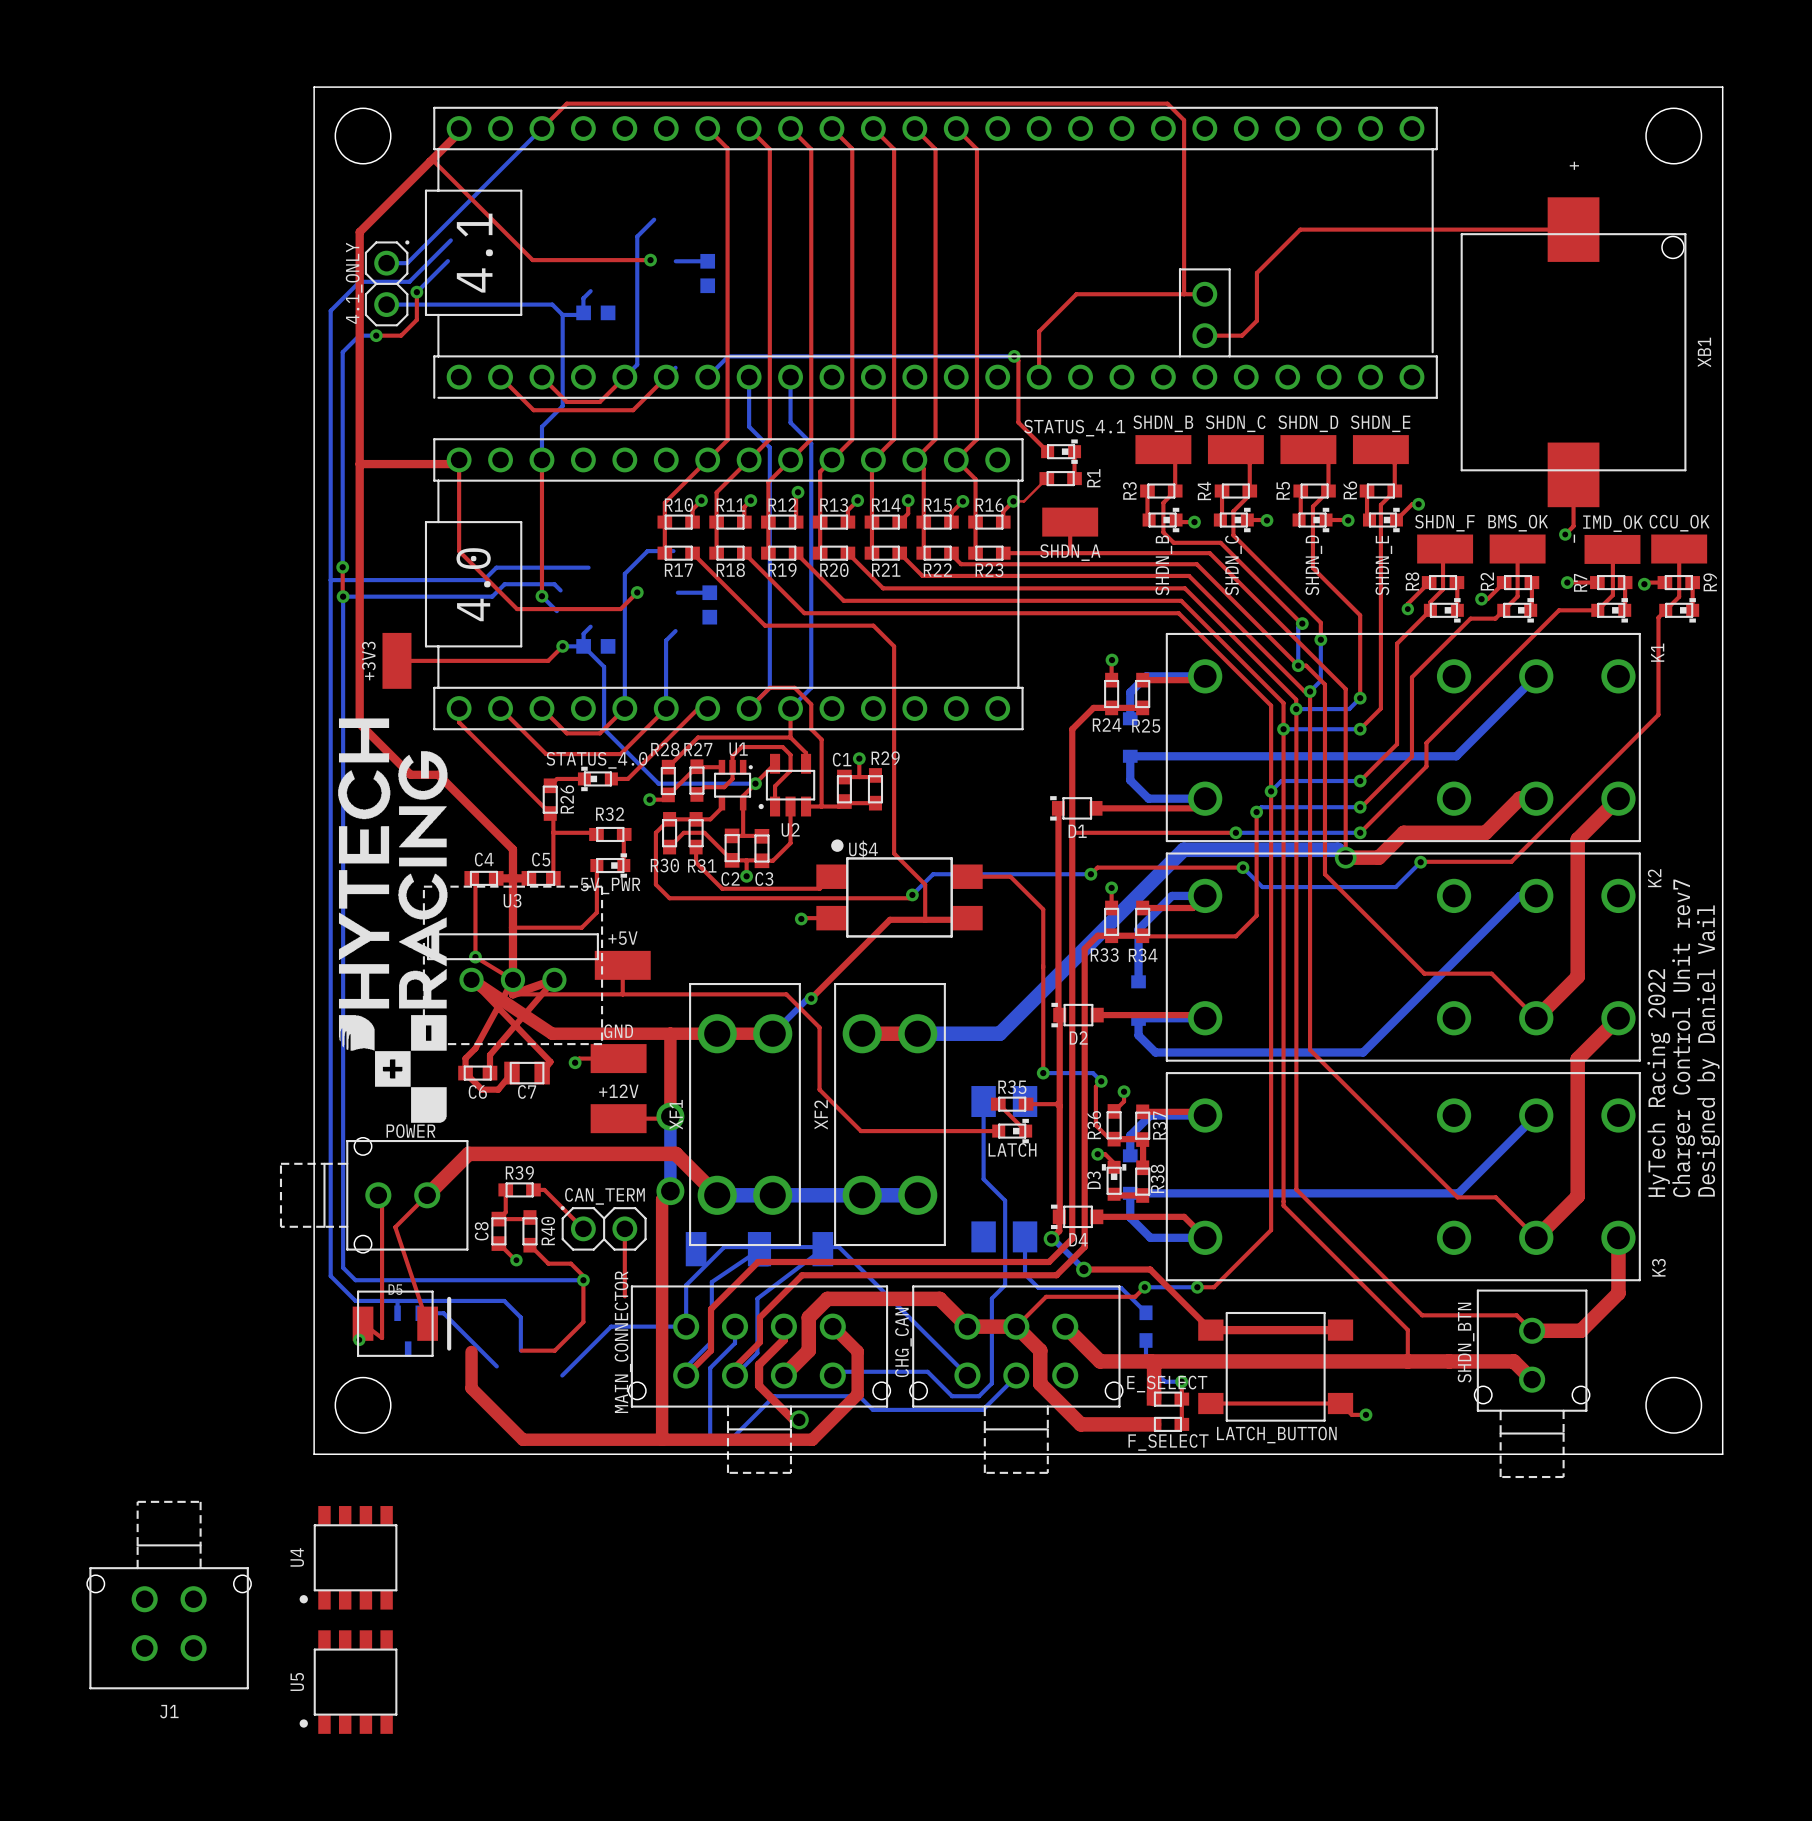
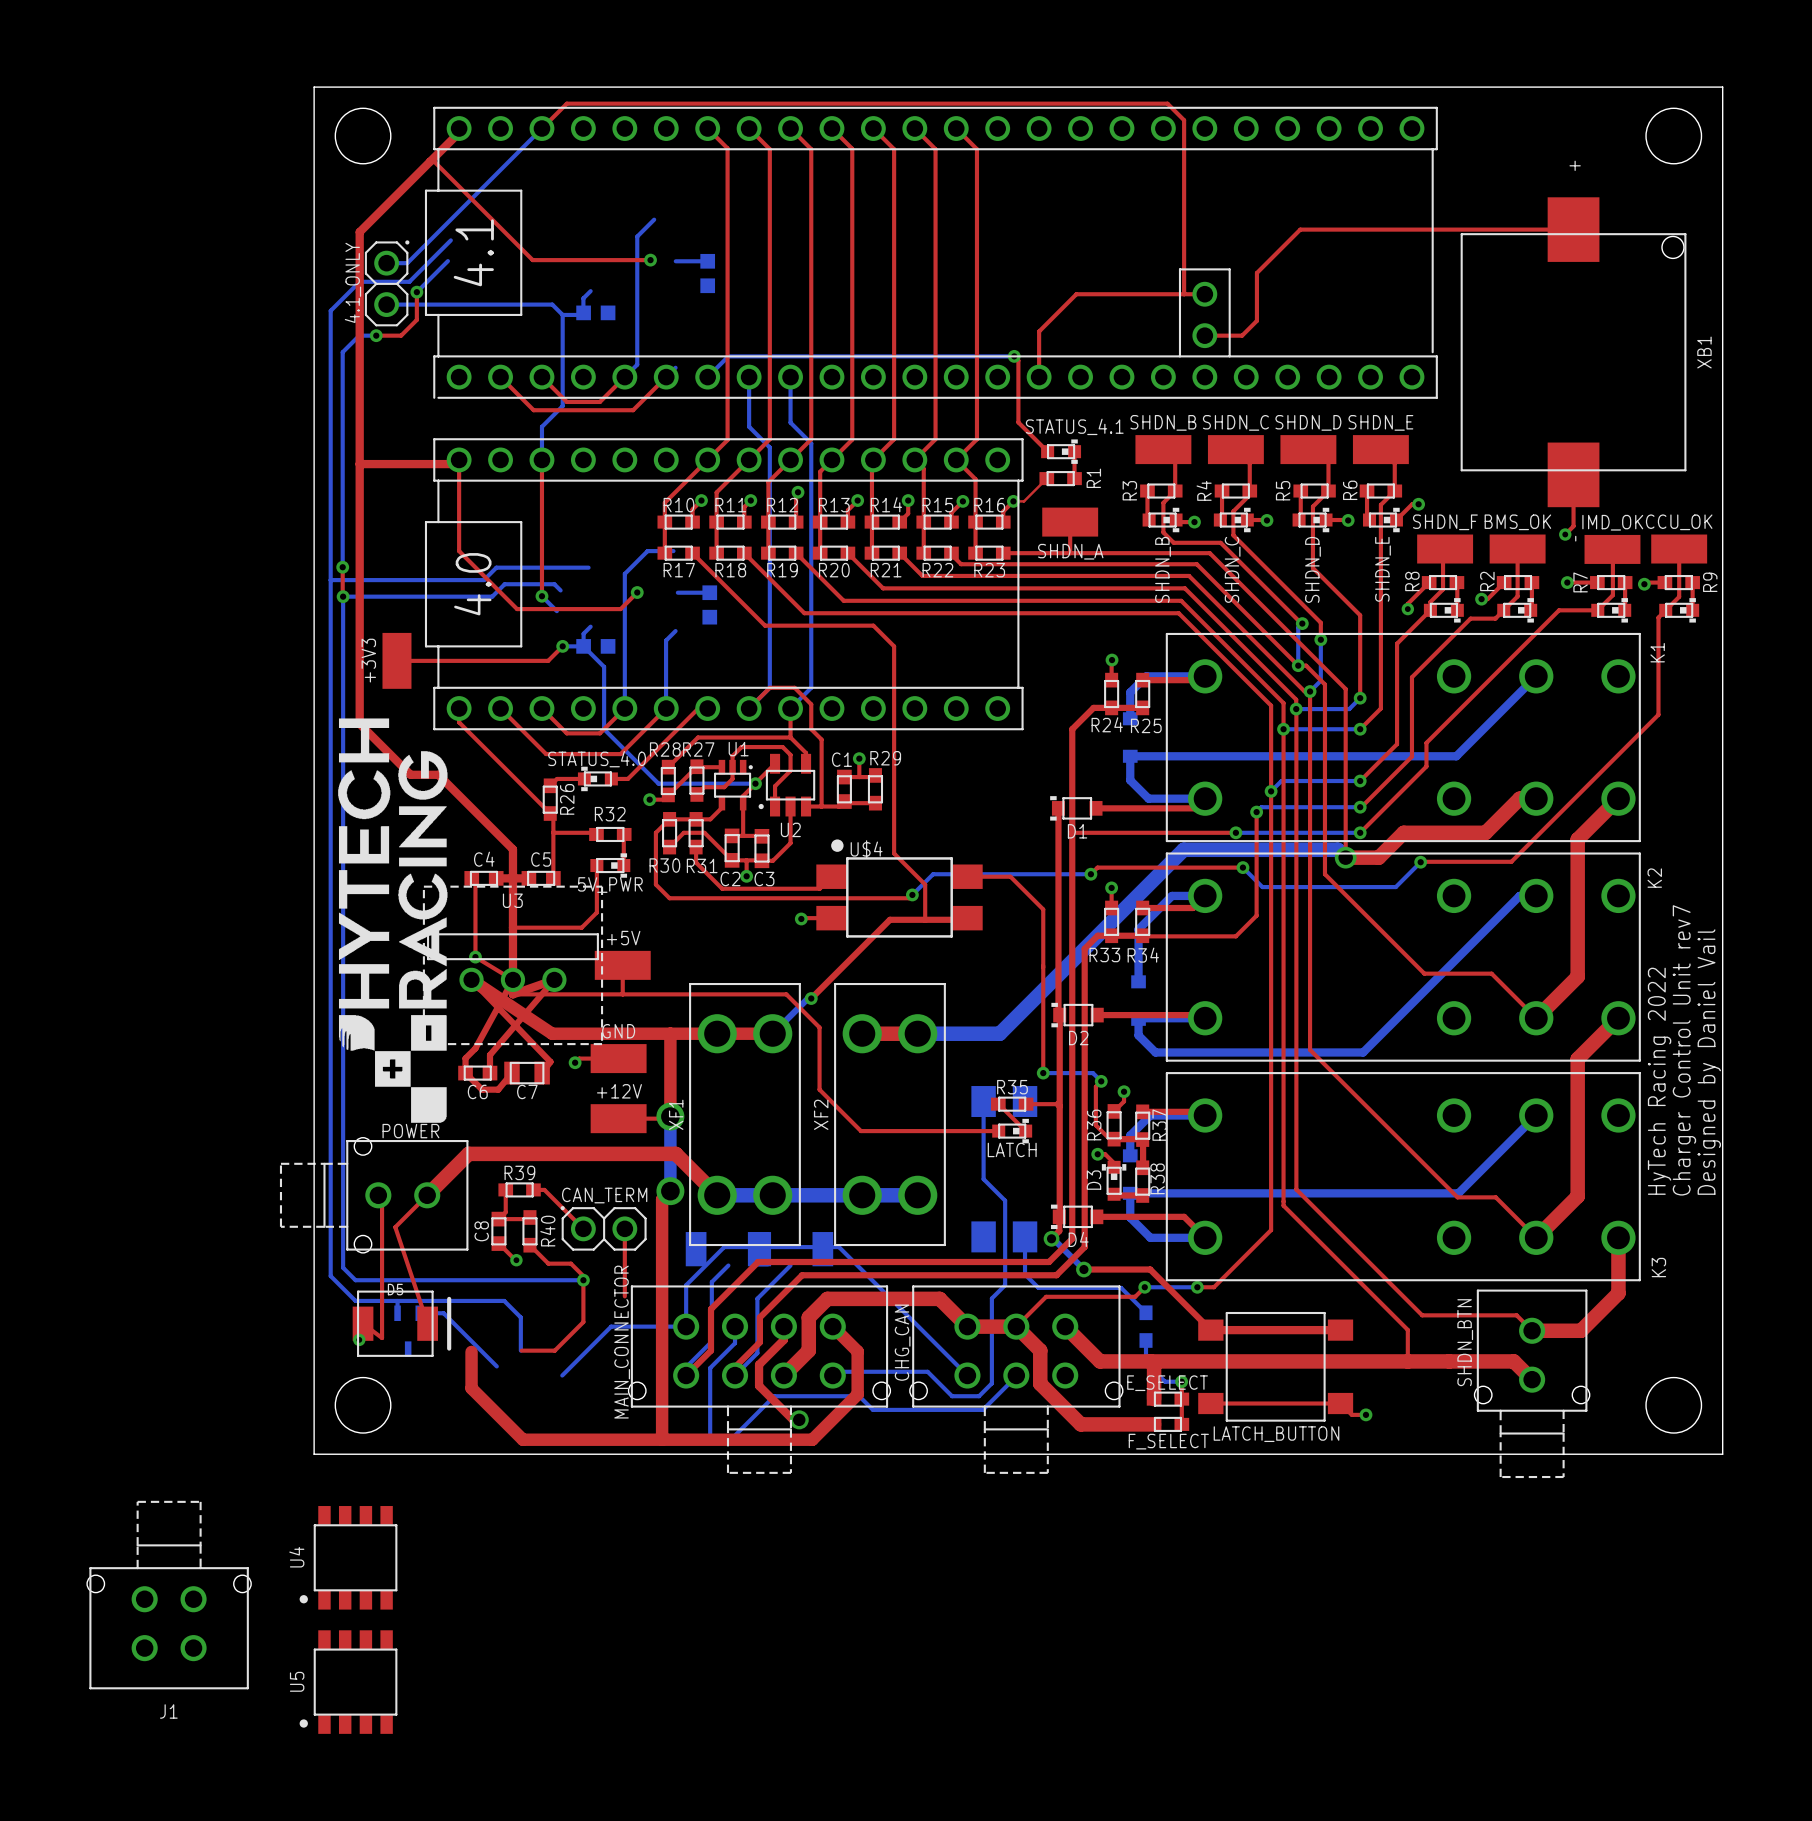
bottom track: (760, 1249) (711, 1282) -> (728, 1265) (711, 1282)
bottom track: (822, 1249) (757, 1298) -> (790, 1265) (757, 1298)

